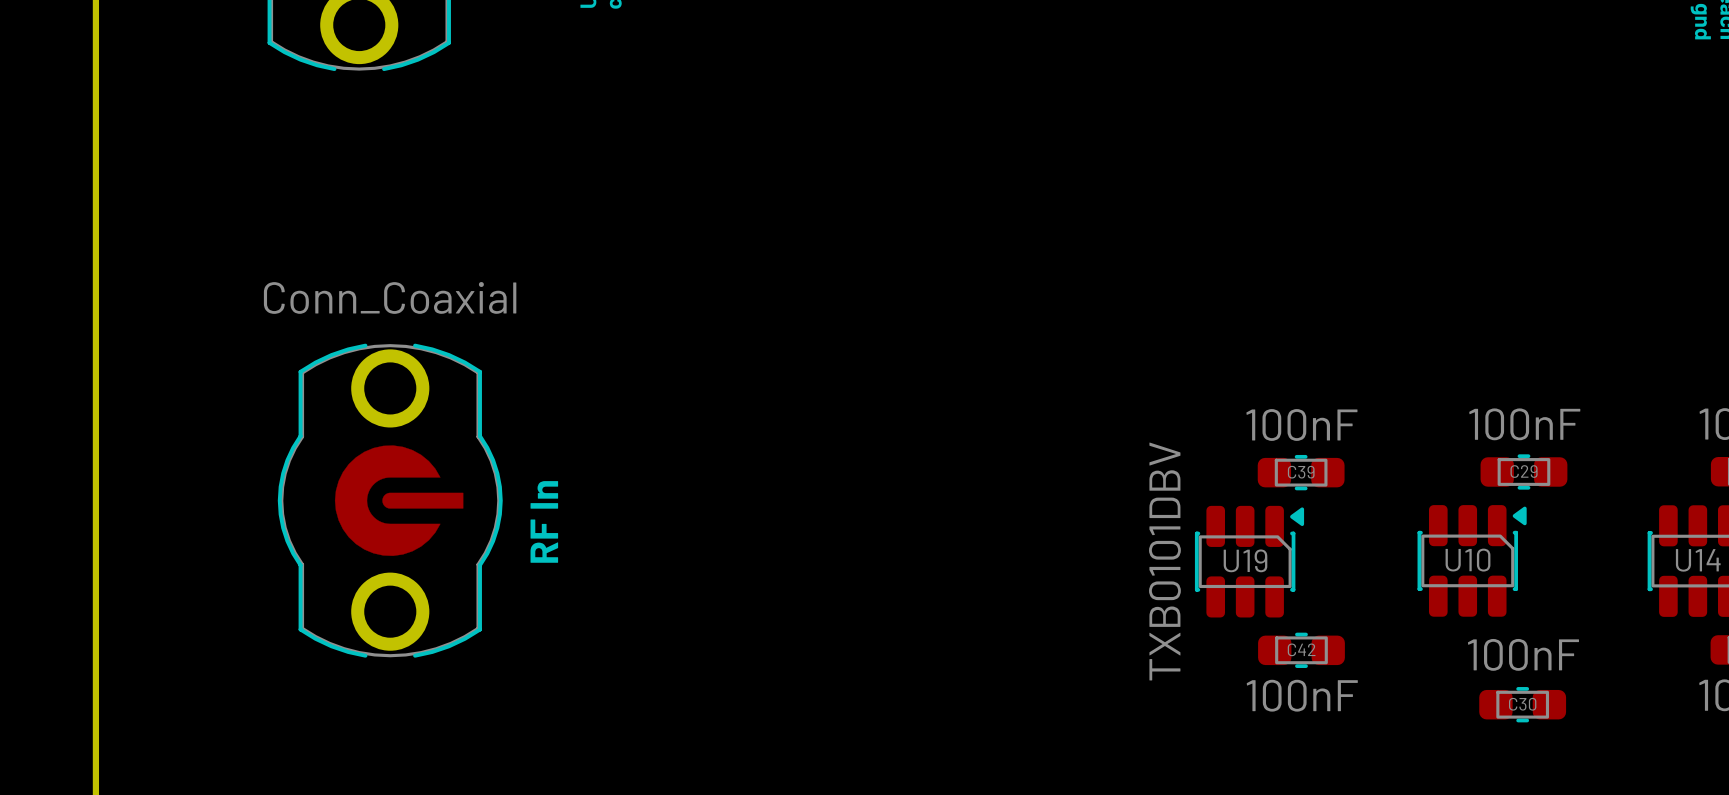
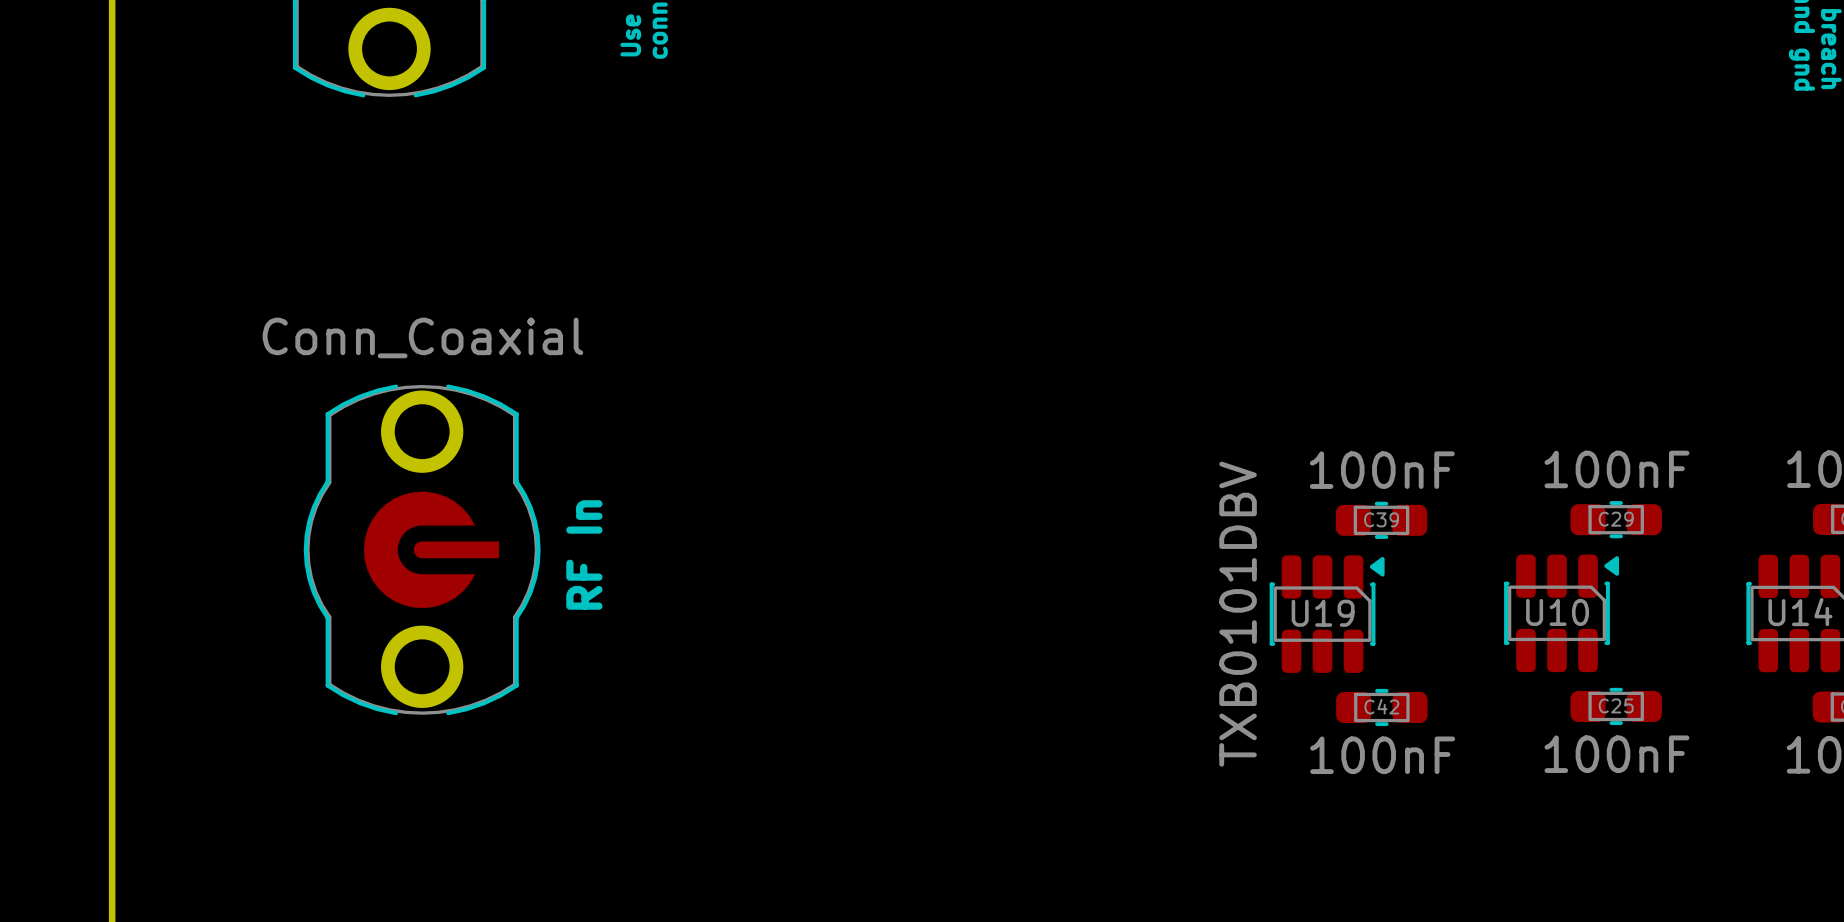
C25: none -> 100nF (1616, 706)
C30: 100nF (1522, 704) -> none

